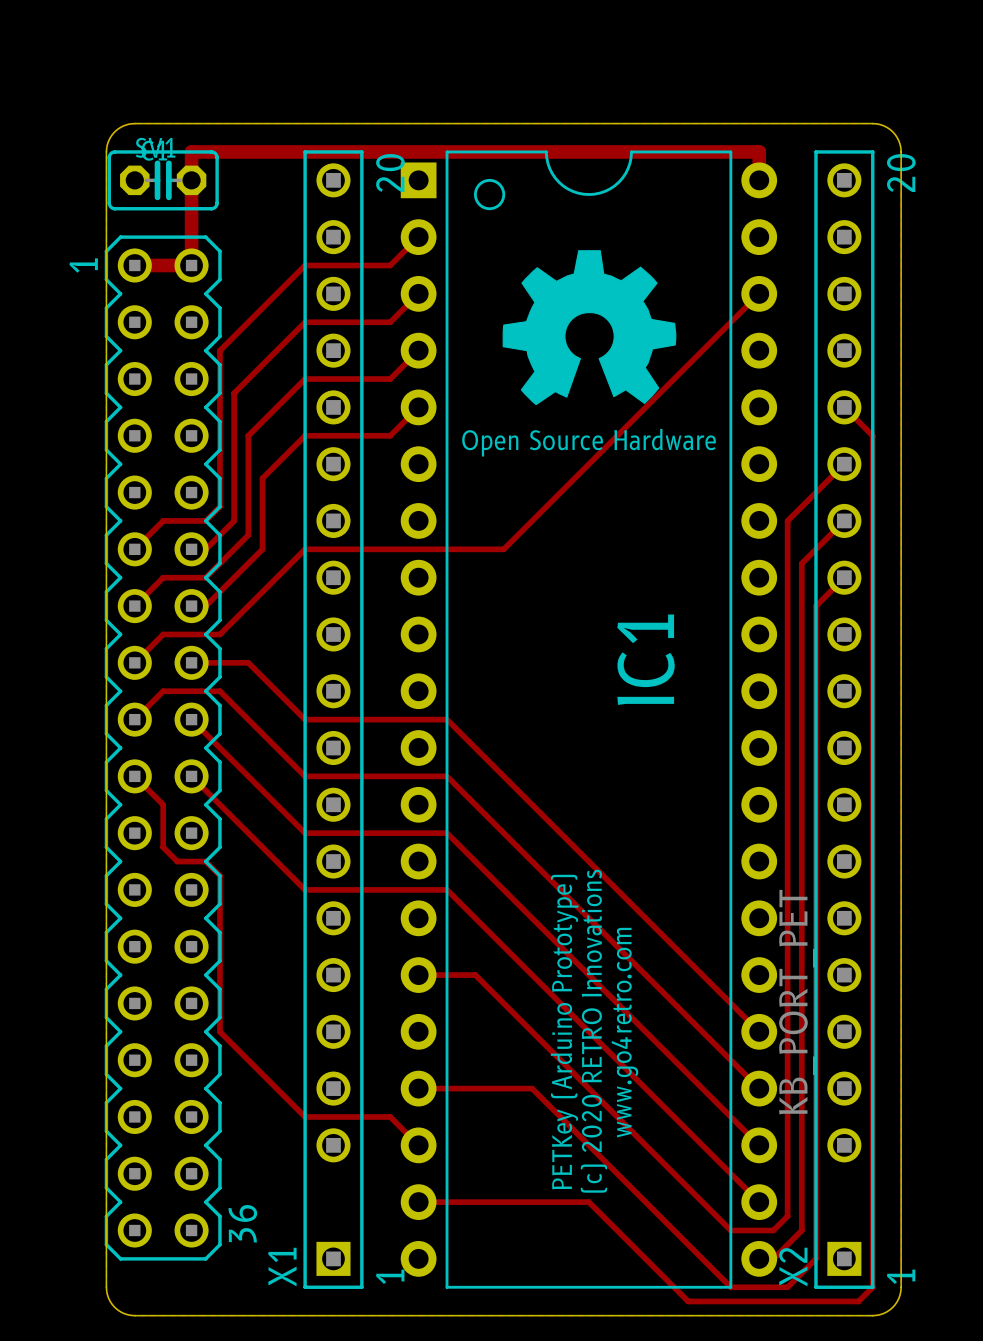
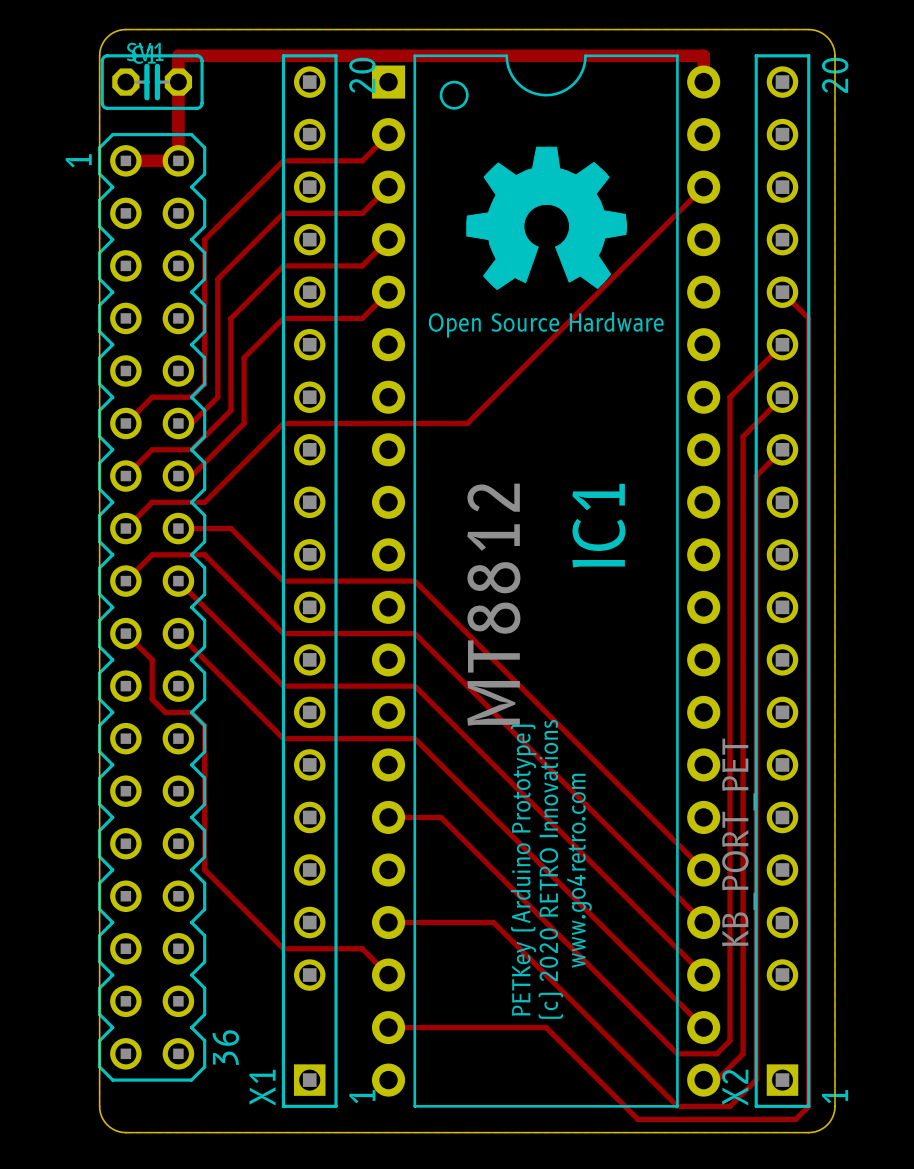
IC1 value: none -> MT8812 (493, 604)

